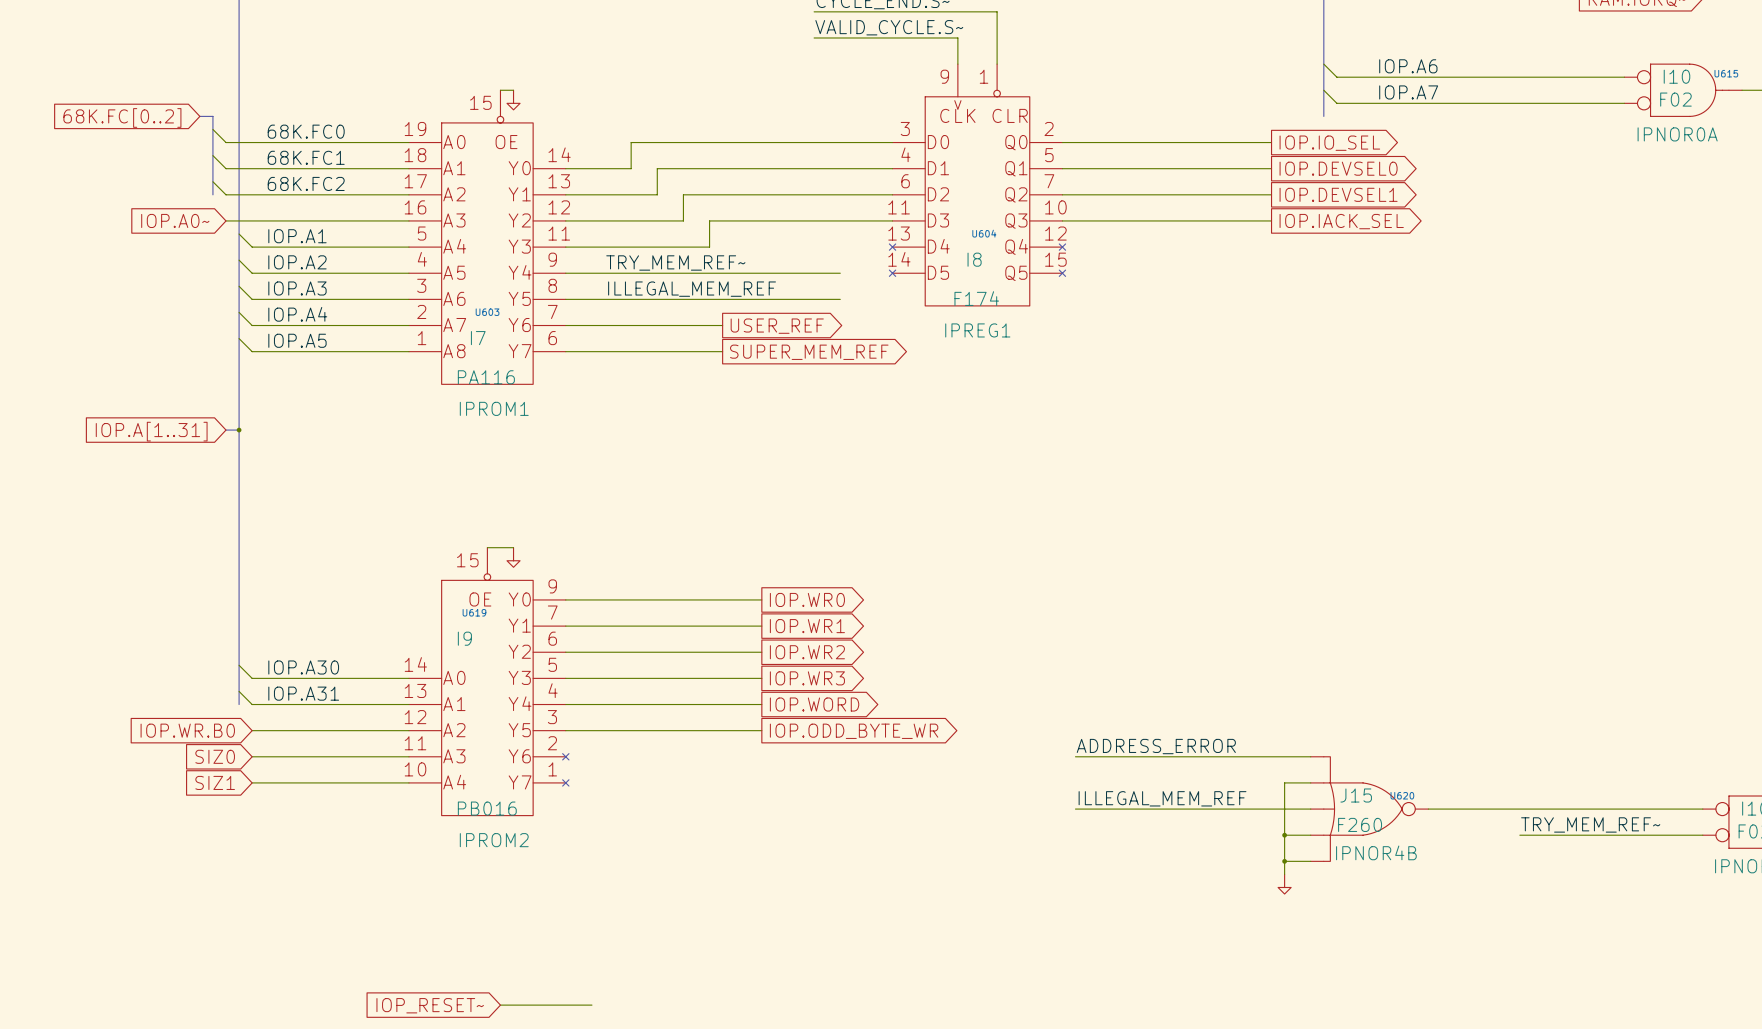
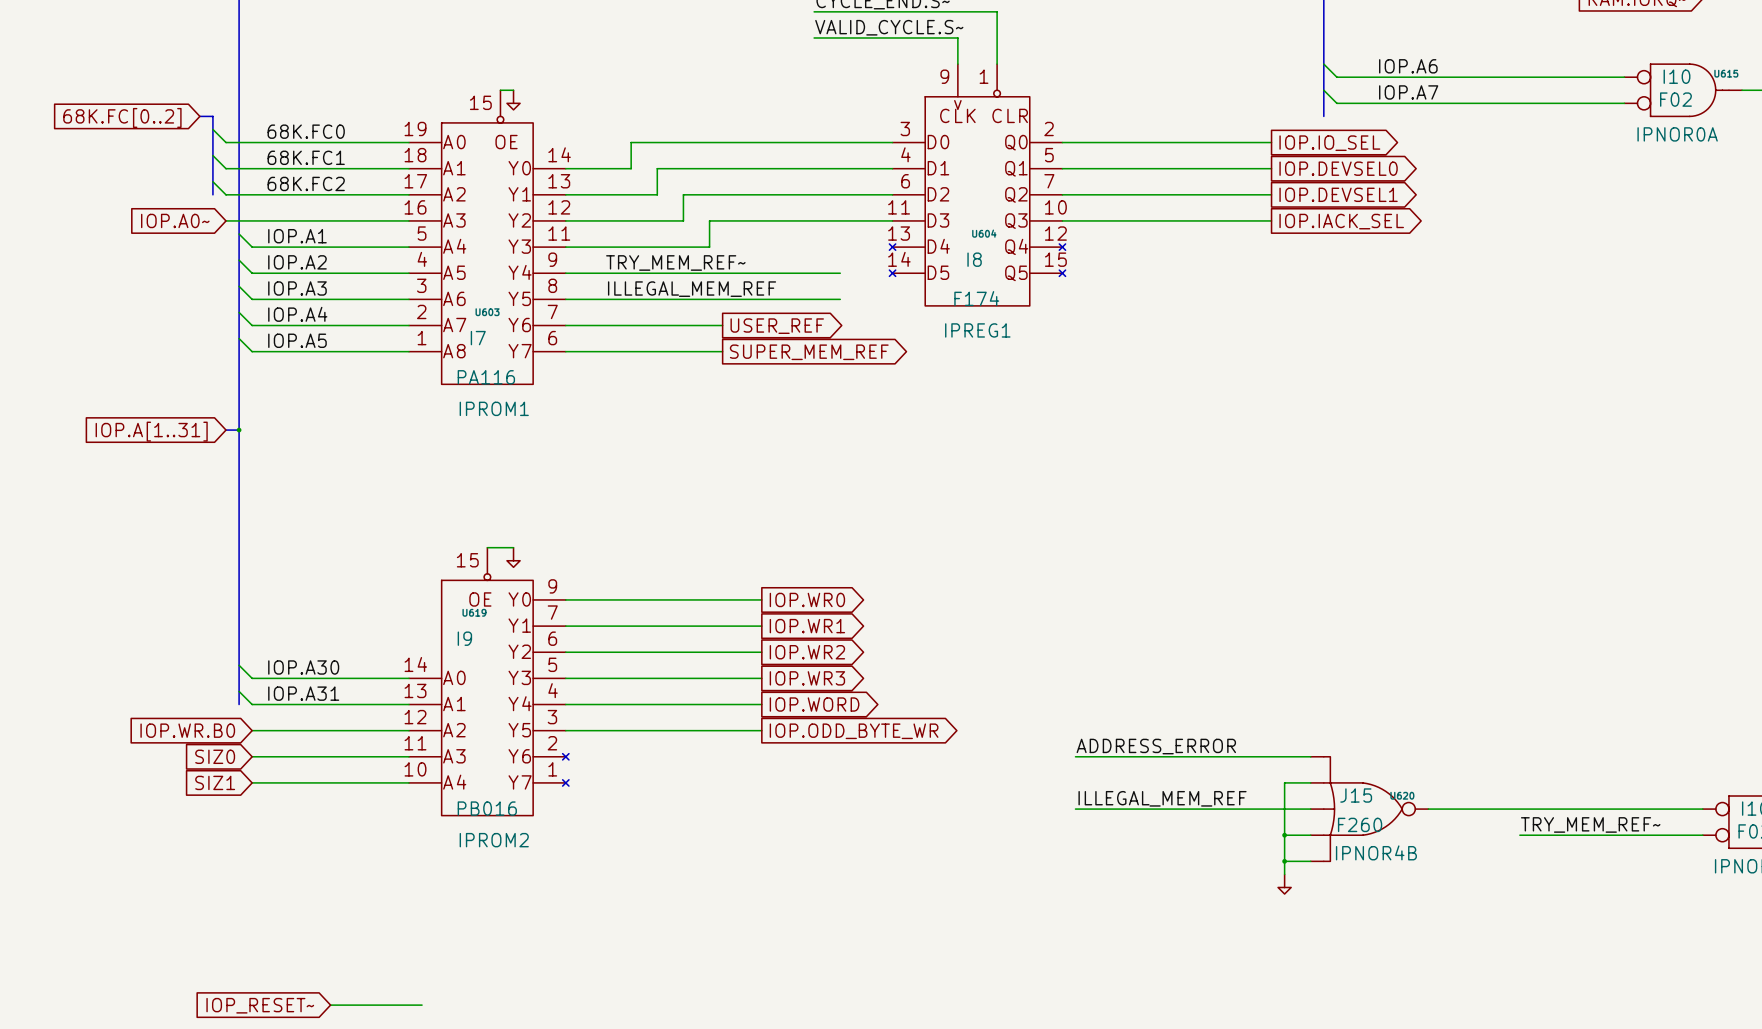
global label: none -> IOP_RESET~ (260, 1005)
wire: none -> (330, 1005) (422, 1005)
global label: IOP_RESET~ (430, 1005) -> none
wire: (500, 1005) (591, 1005) -> none

